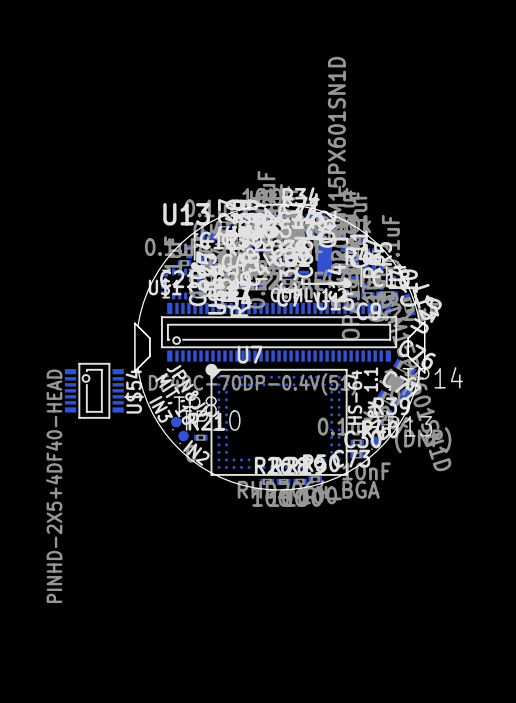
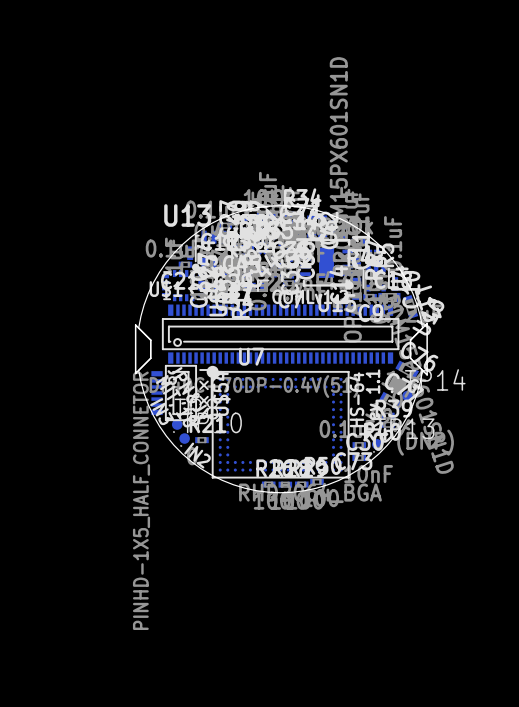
U$54 footprint: [64, 362, 124, 419] -> [151, 364, 213, 422]
U$54 value: PINHD-2X5+4DF40-HEAD (54, 486) -> PINHD-1X5_HALF_CONNETOR (141, 500)

